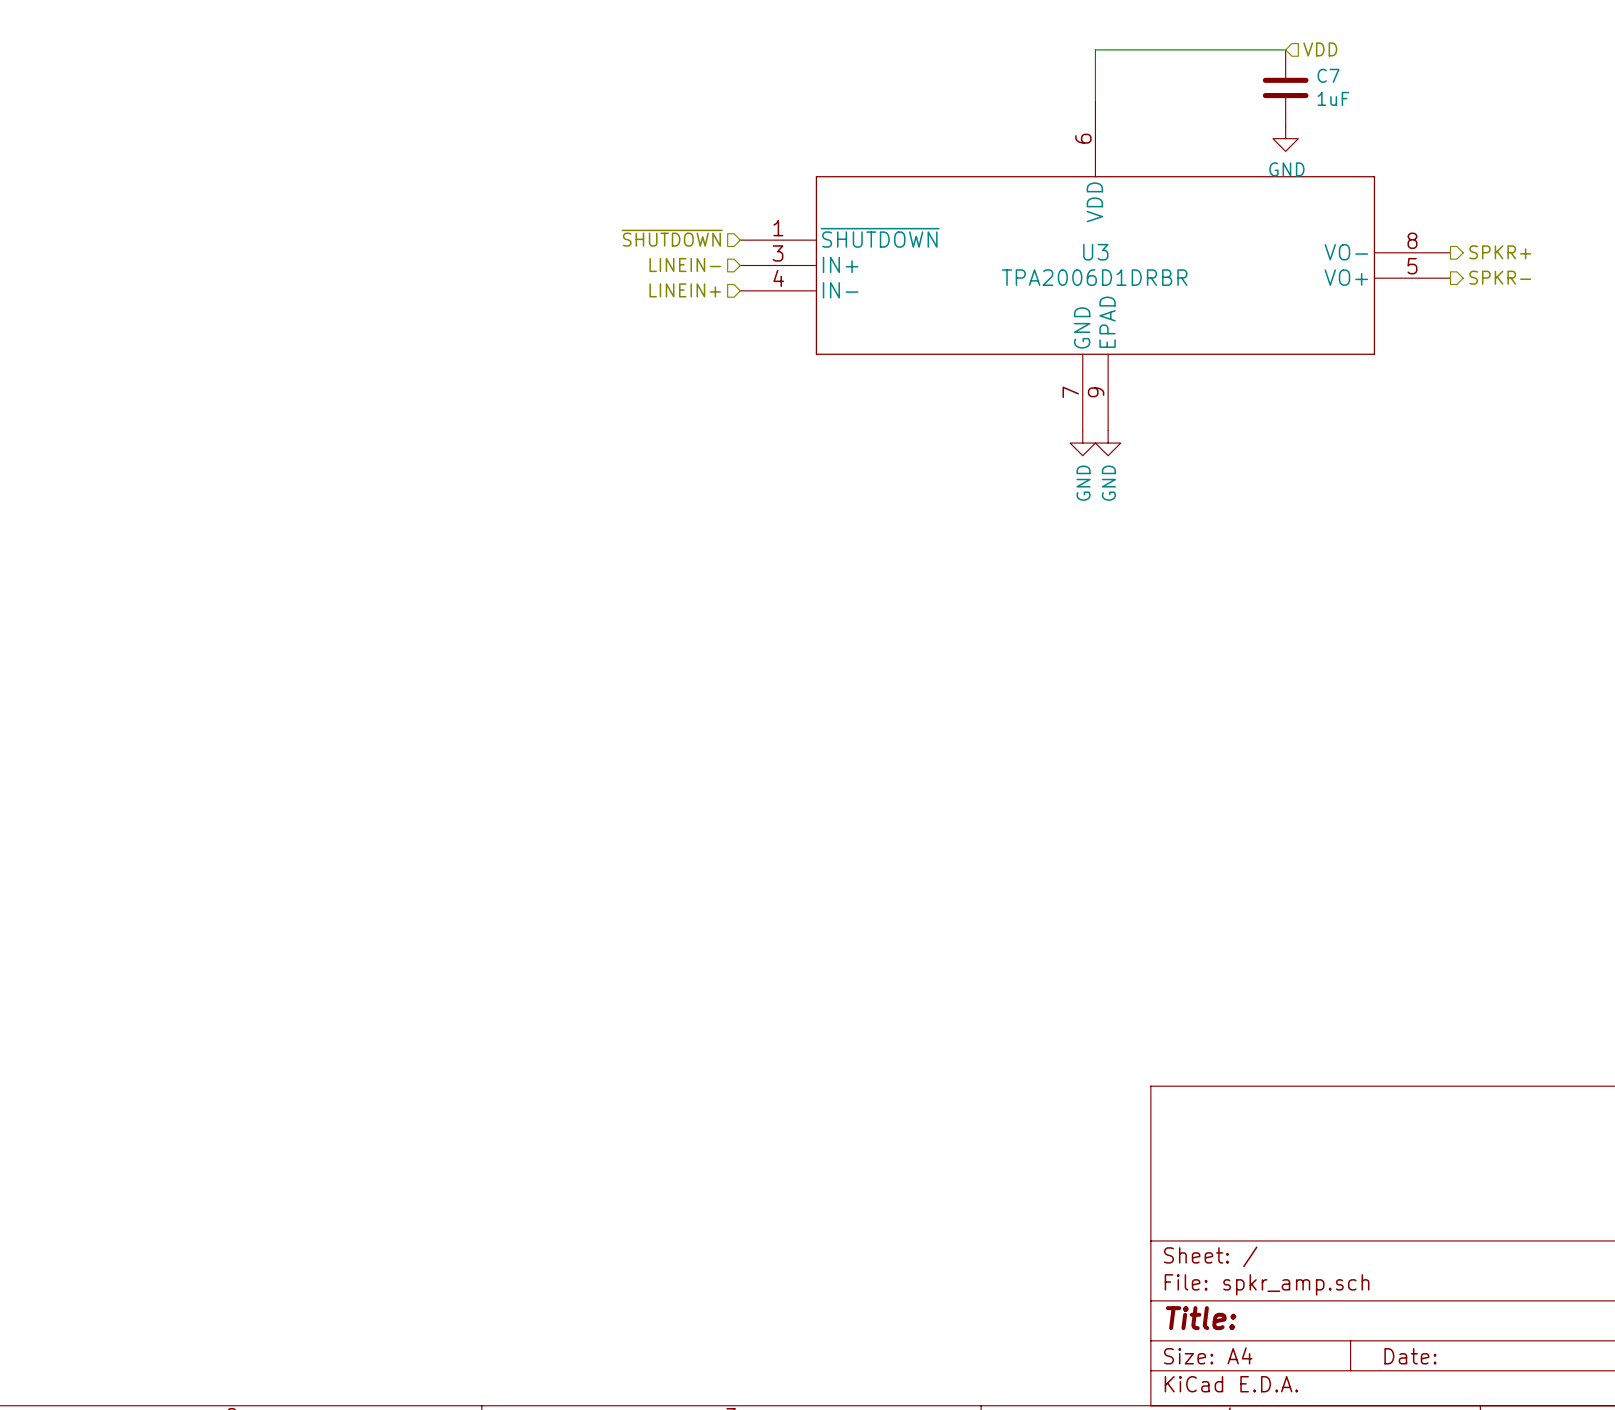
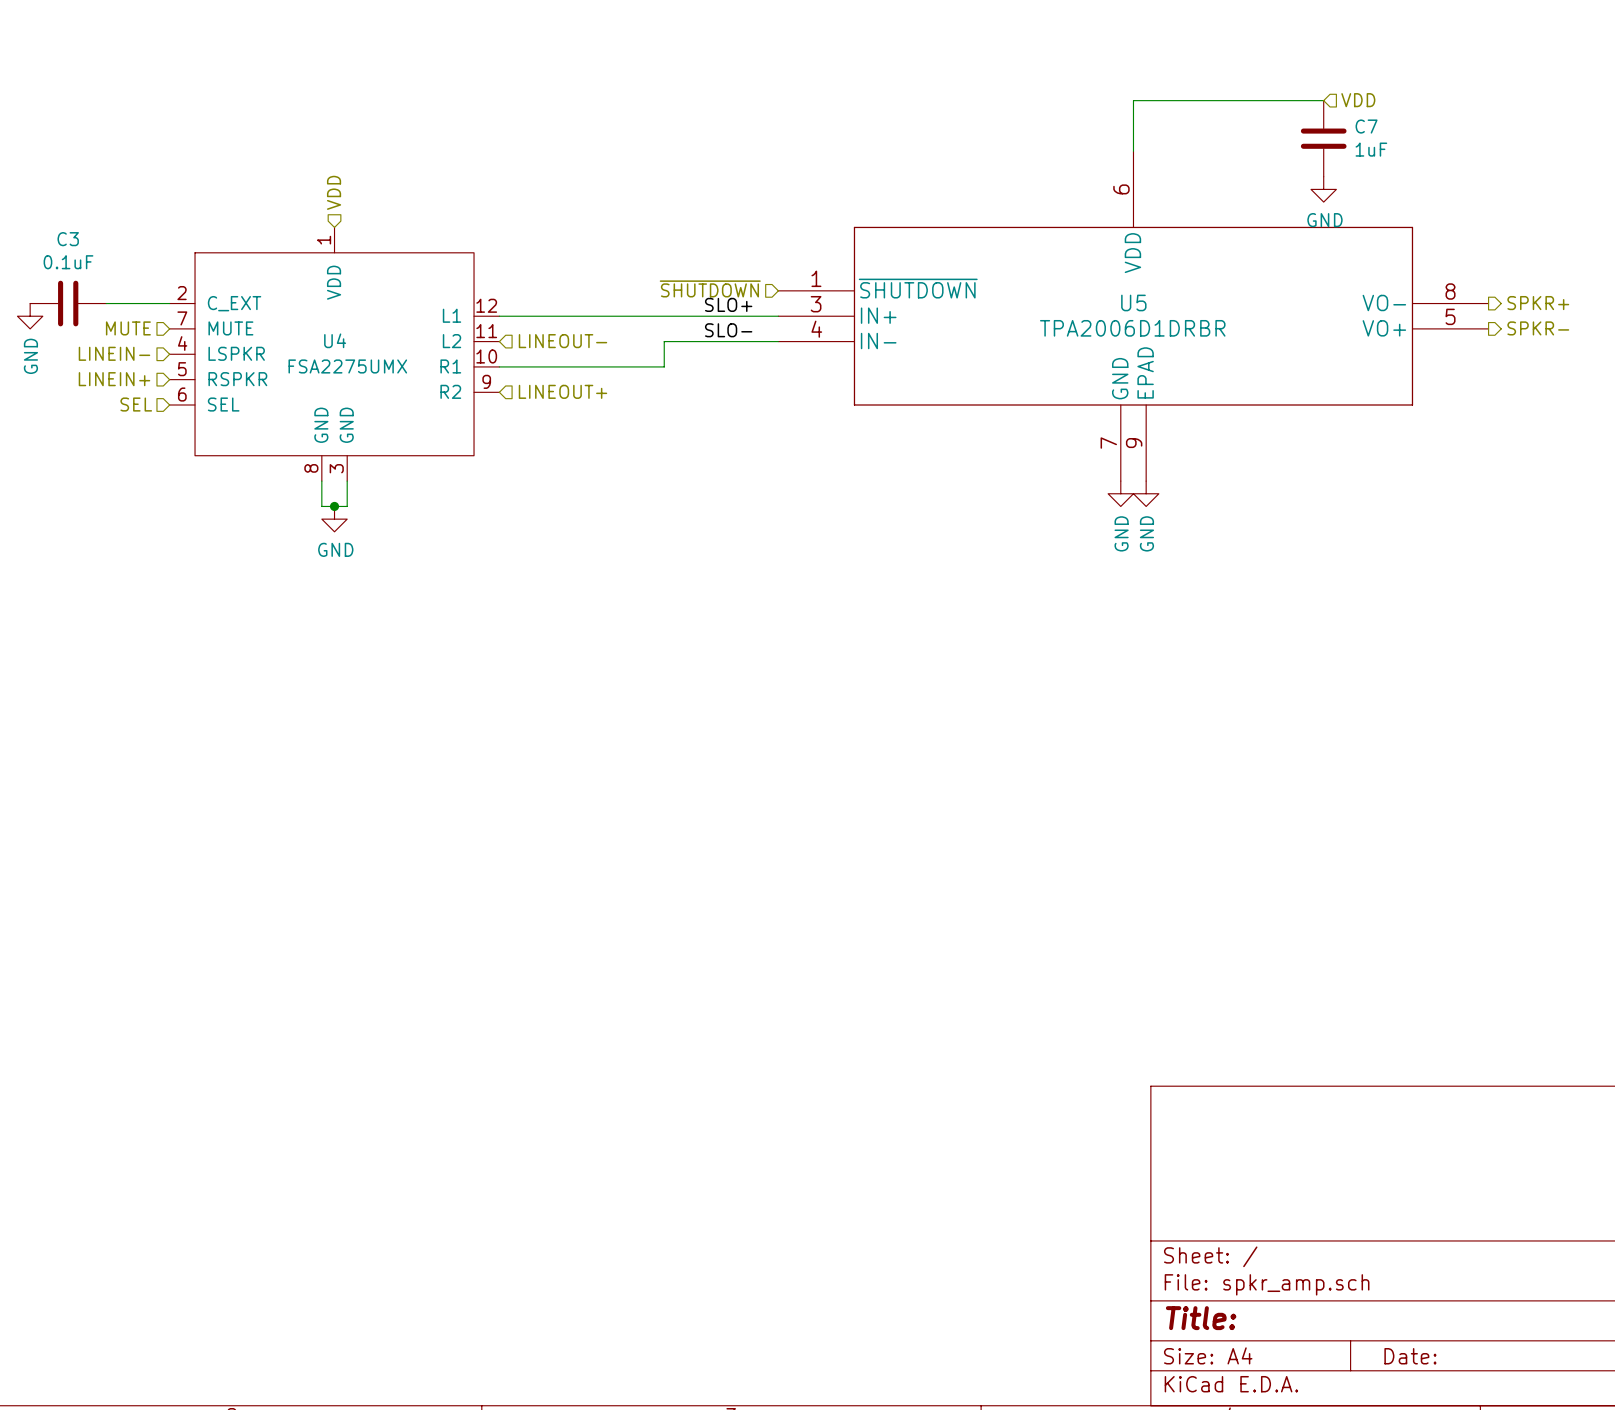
wire: (1285, 49) (1095, 49) (1095, 100) -> (1323, 100) (1133, 100) (1133, 151)
hierarchical label position: VDD (1320, 49) -> VDD (1358, 100)
C7 position: (1285, 87) -> (1323, 138)
power symbol position: GND (1285, 138) -> GND (1323, 189)
hierarchical label: none -> VDD (334, 192)
hierarchical label position: ~{SHUTDOWN} (672, 238) -> ~{SHUTDOWN} (710, 288)
hierarchical label position: SPKR+ (1500, 252) -> SPKR+ (1538, 303)
hierarchical label: LINEIN- (685, 265) -> none
U3: TPA2006D1DRBR (1095, 265) -> none
hierarchical label position: SPKR- (1500, 277) -> SPKR- (1538, 328)
hierarchical label: LINEIN+ (685, 290) -> none
C3: none -> 0.1uF (68, 303)
wire: none -> (106, 303) (169, 303)
label: none -> SLO+ (728, 304)
power symbol: none -> GND (30, 316)
wire: none -> (499, 316) (778, 316)
U5: none -> TPA2006D1DRBR (1133, 316)
hierarchical label: none -> MUTE (128, 328)
label: none -> SLO- (728, 330)
hierarchical label: none -> LINEOUT- (562, 341)
wire: none -> (778, 341) (664, 341) (664, 366) (499, 366)
hierarchical label: none -> LINEIN- (114, 353)
U4: none -> FSA2275UMX (334, 354)
hierarchical label: none -> LINEIN+ (114, 379)
hierarchical label: none -> LINEOUT+ (562, 391)
hierarchical label: none -> SEL (136, 404)
power symbol: GND (1082, 443) -> none
power symbol: GND (1108, 443) -> none
wire: none -> (321, 481) (321, 506) (347, 506) (347, 481)
power symbol: none -> GND (1120, 493)
power symbol: none -> GND (1146, 493)
junction: none -> (334, 506)
power symbol: none -> GND (334, 519)

